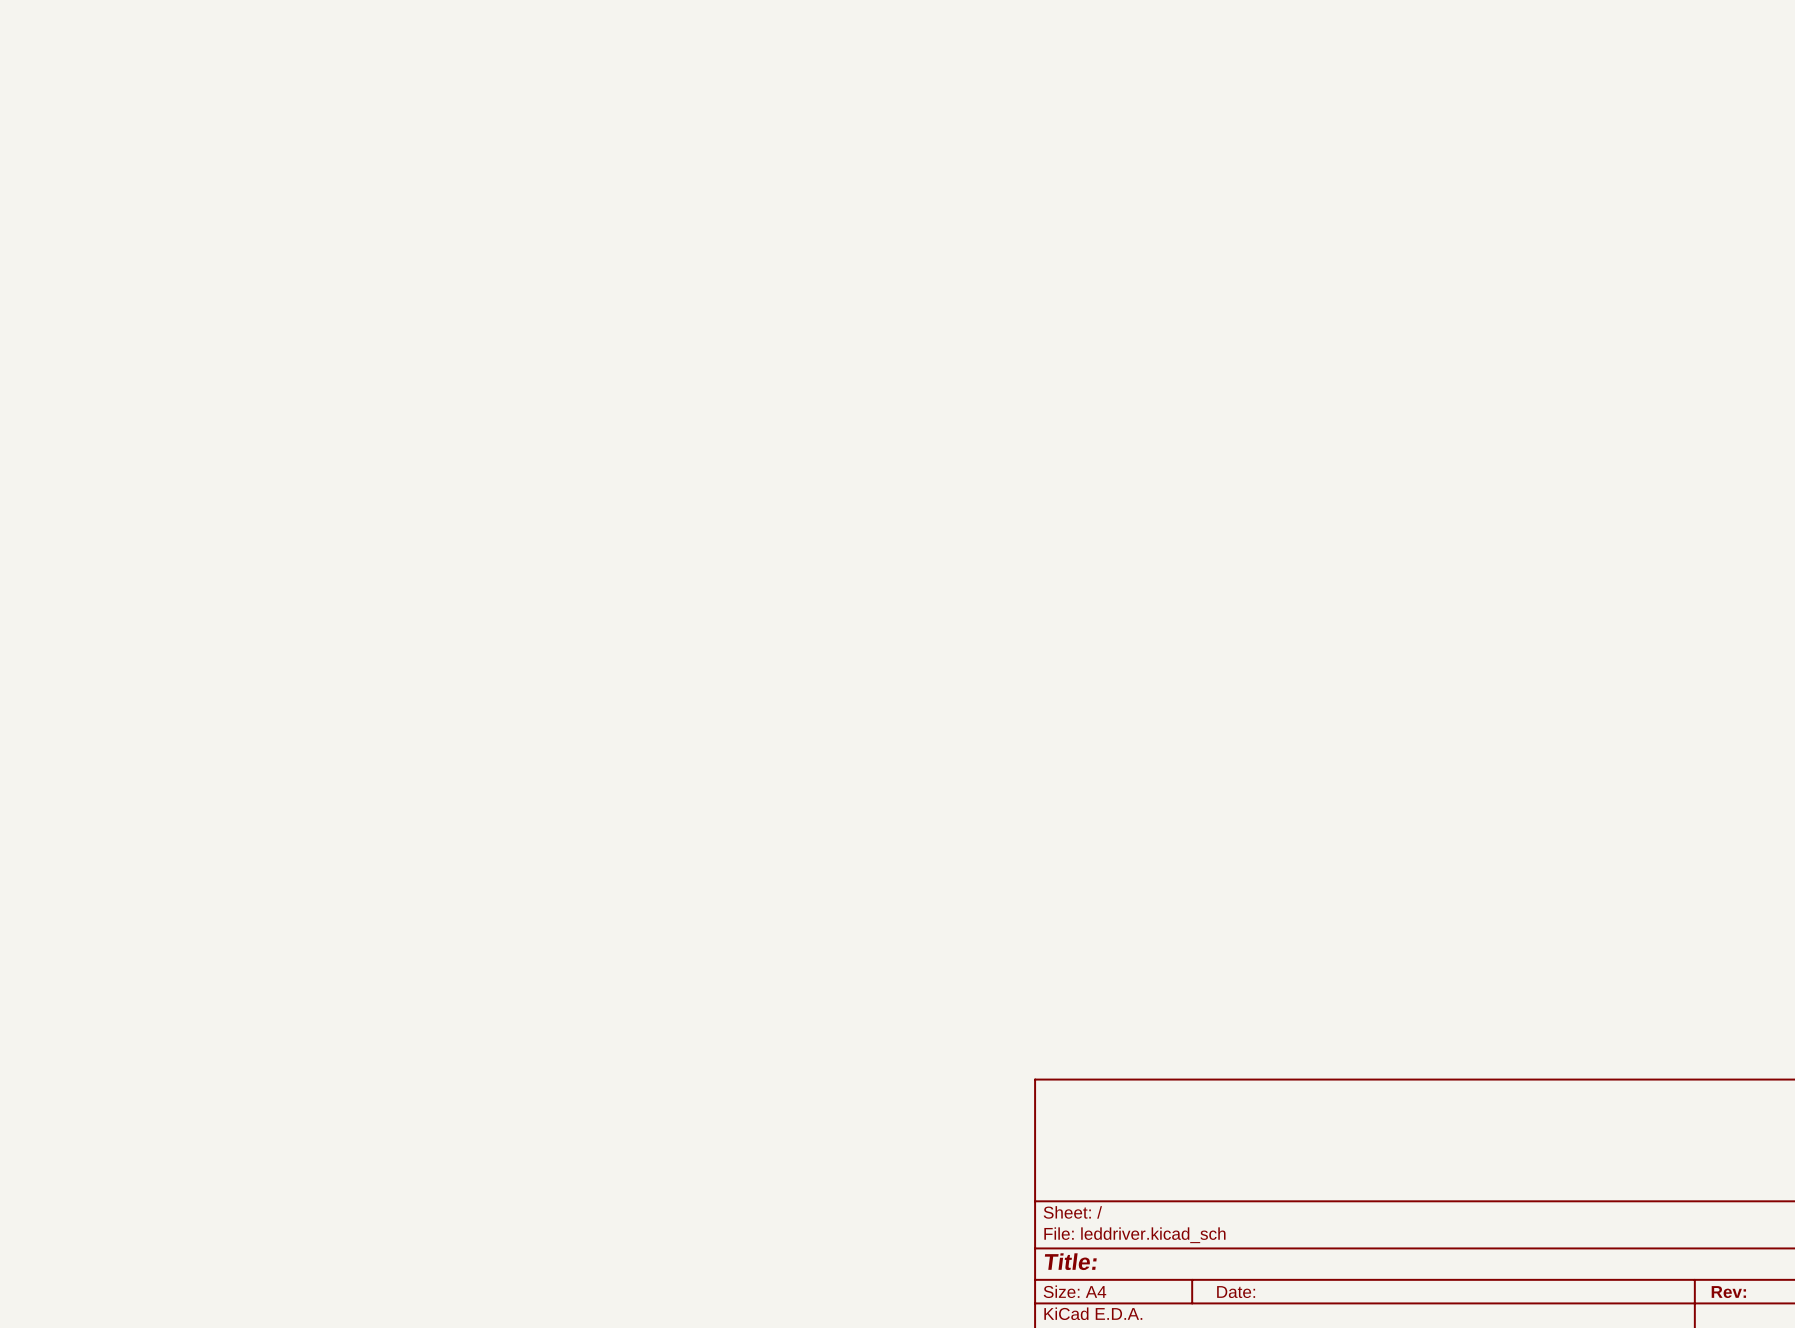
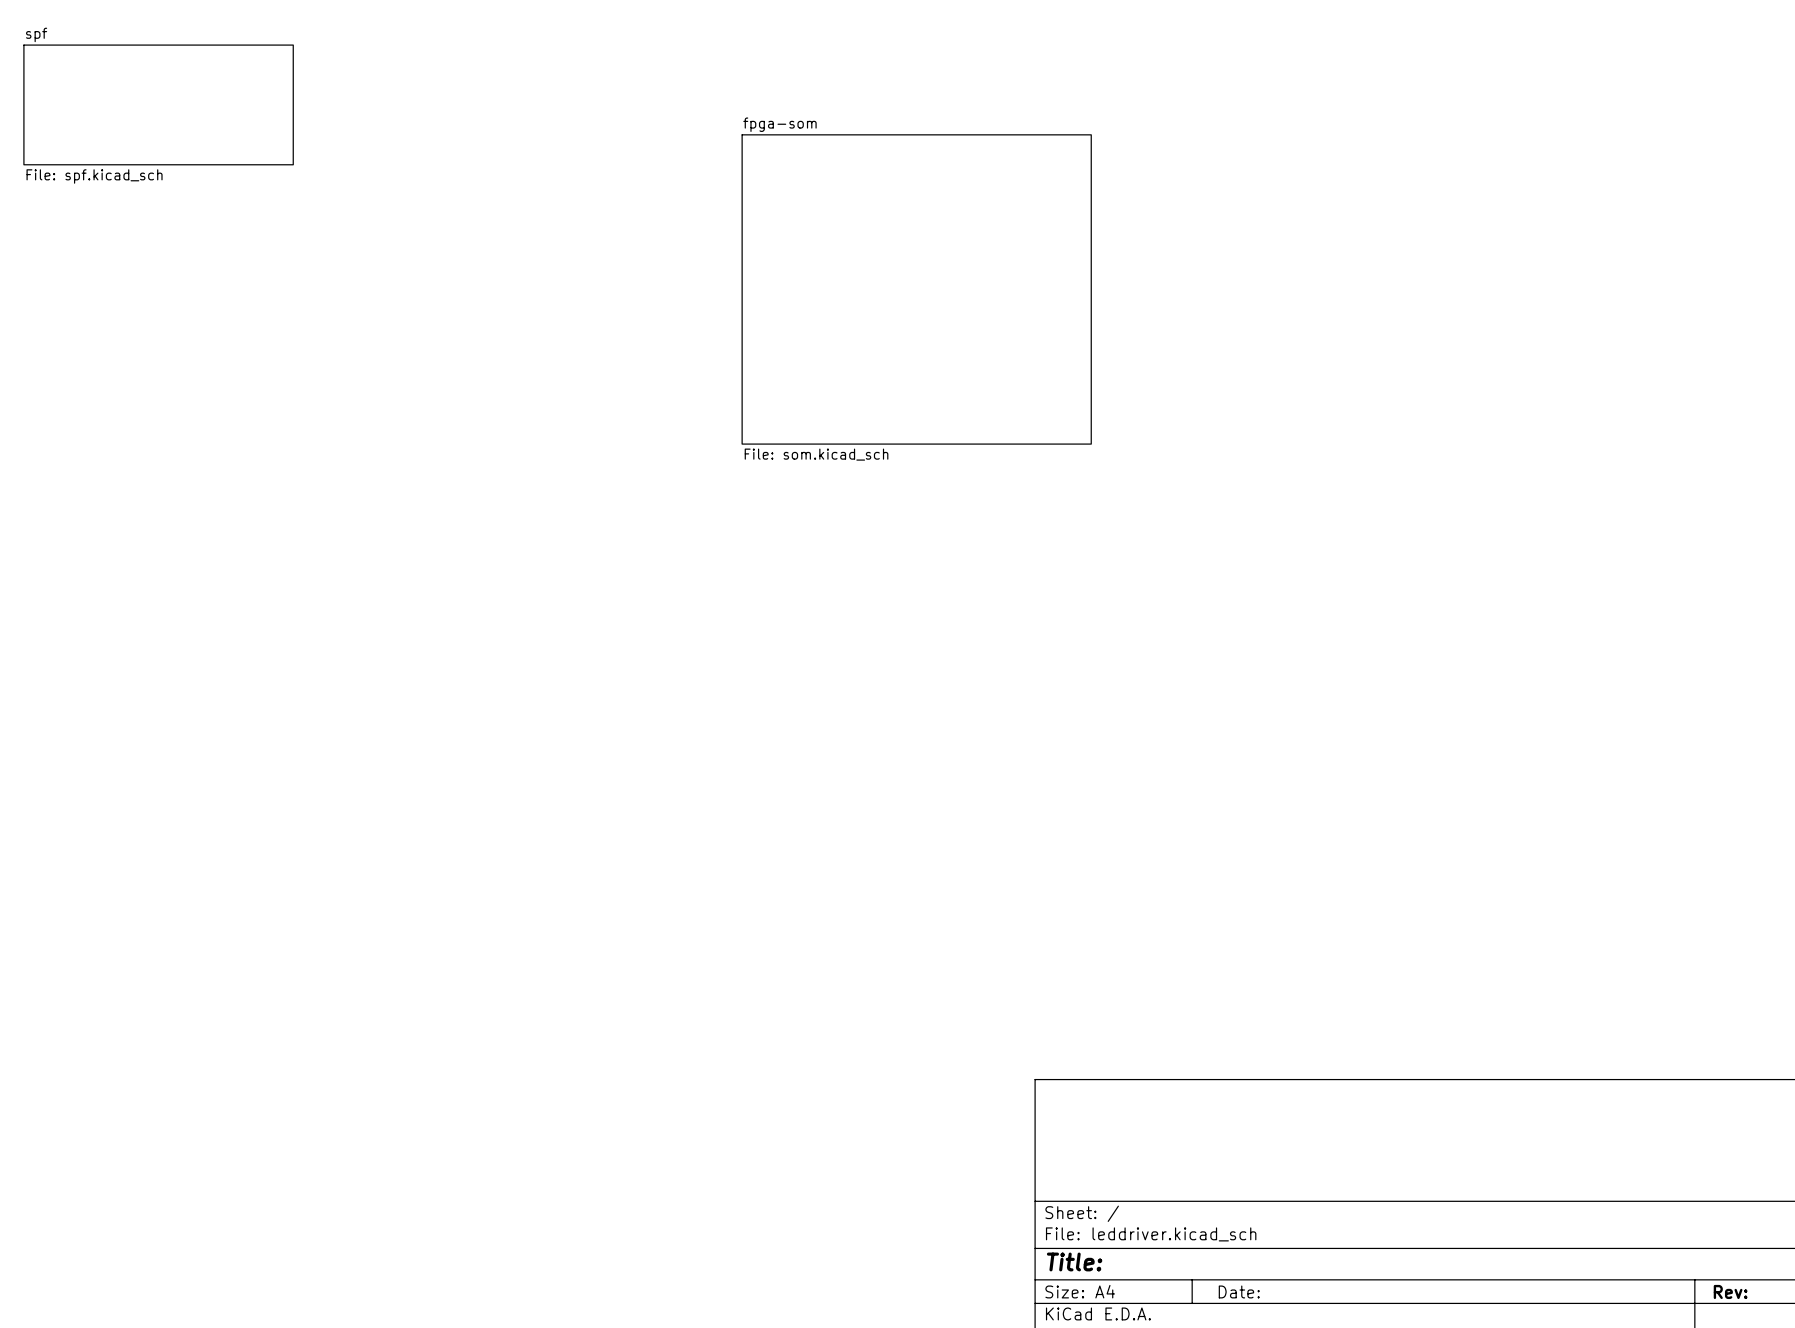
sheet spf: none -> File: spf.kicad_sch (158, 104)
sheet fpga-som: none -> File: som.kicad_sch (916, 289)

